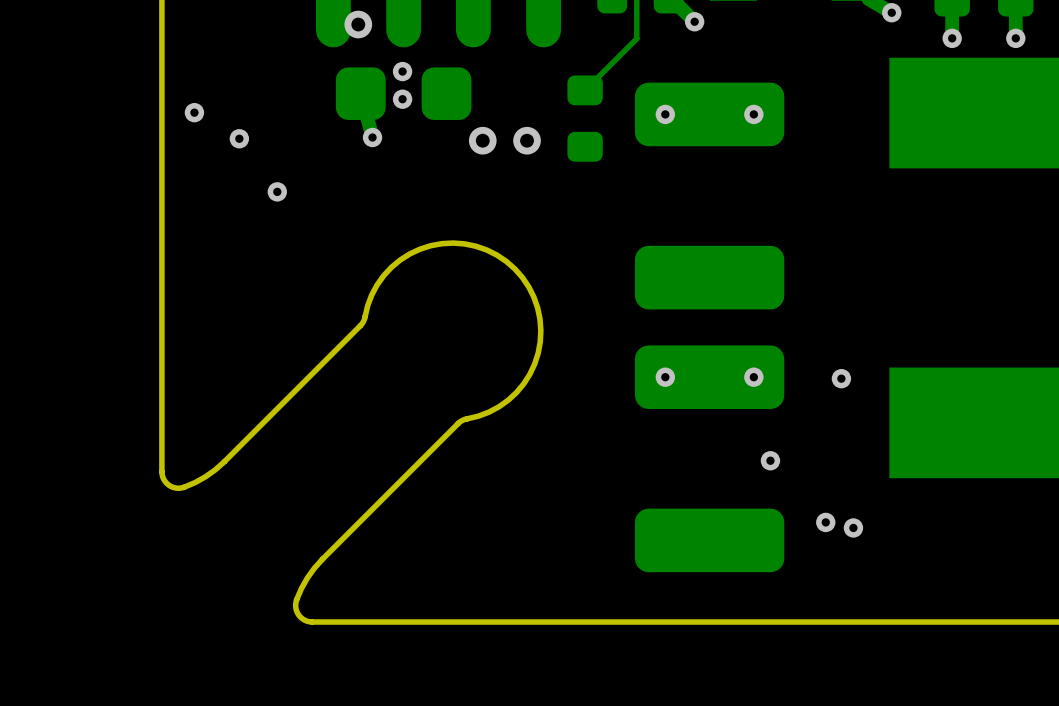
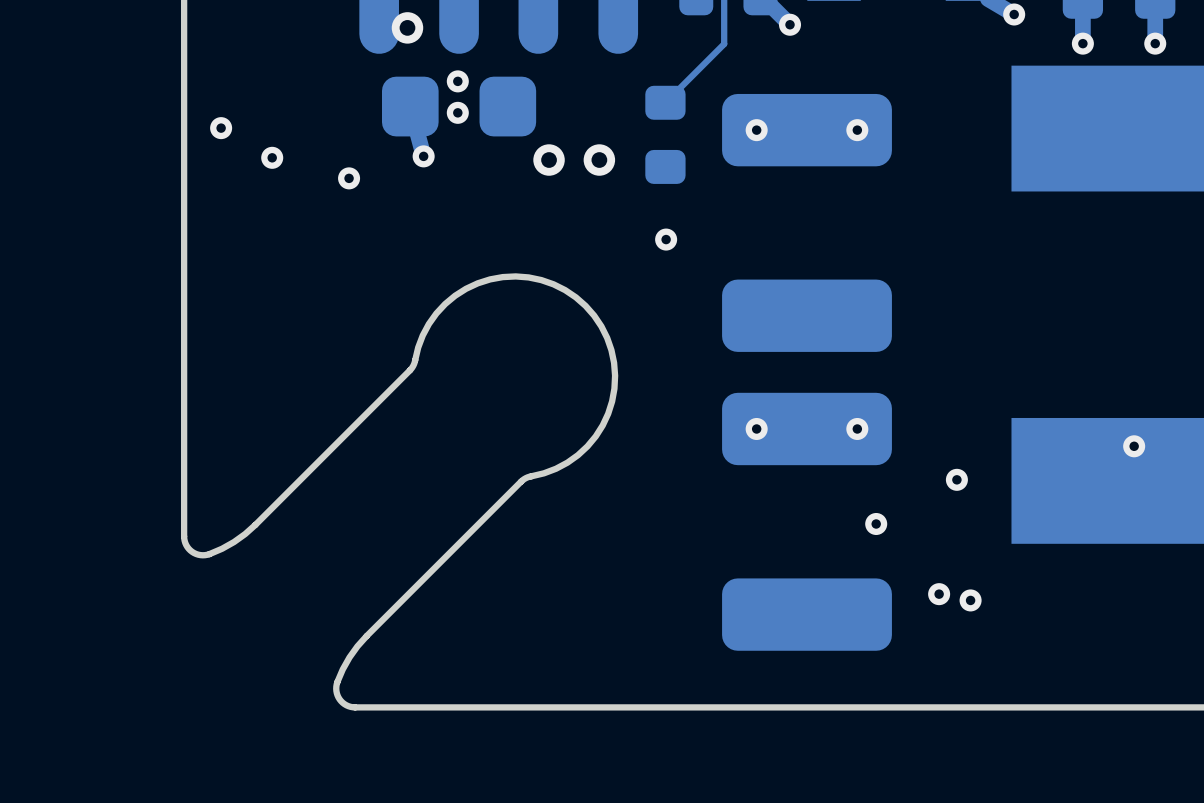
via position: (277, 191) -> (349, 178)
via: none -> (666, 239)
via position: (841, 378) -> (956, 479)
via: none -> (1134, 446)

